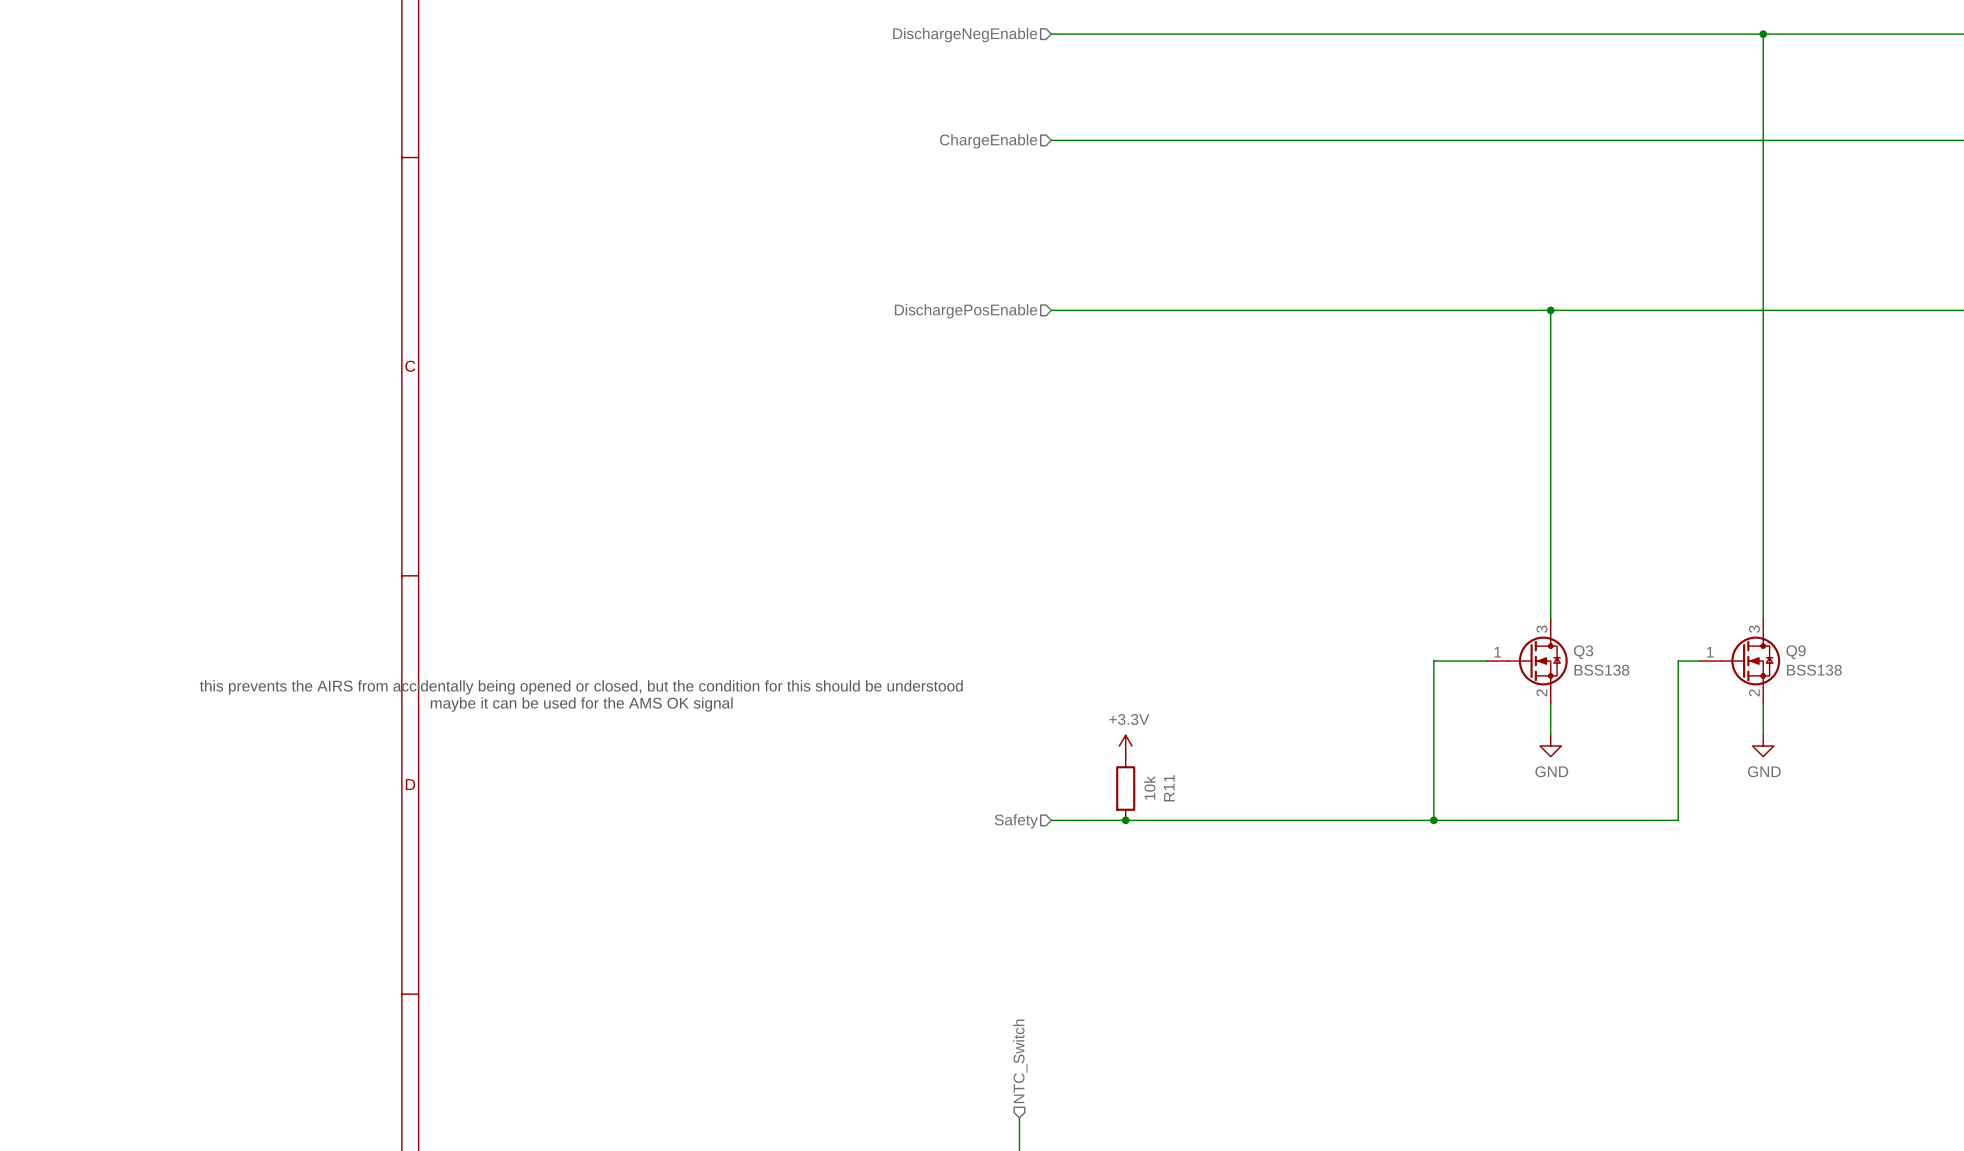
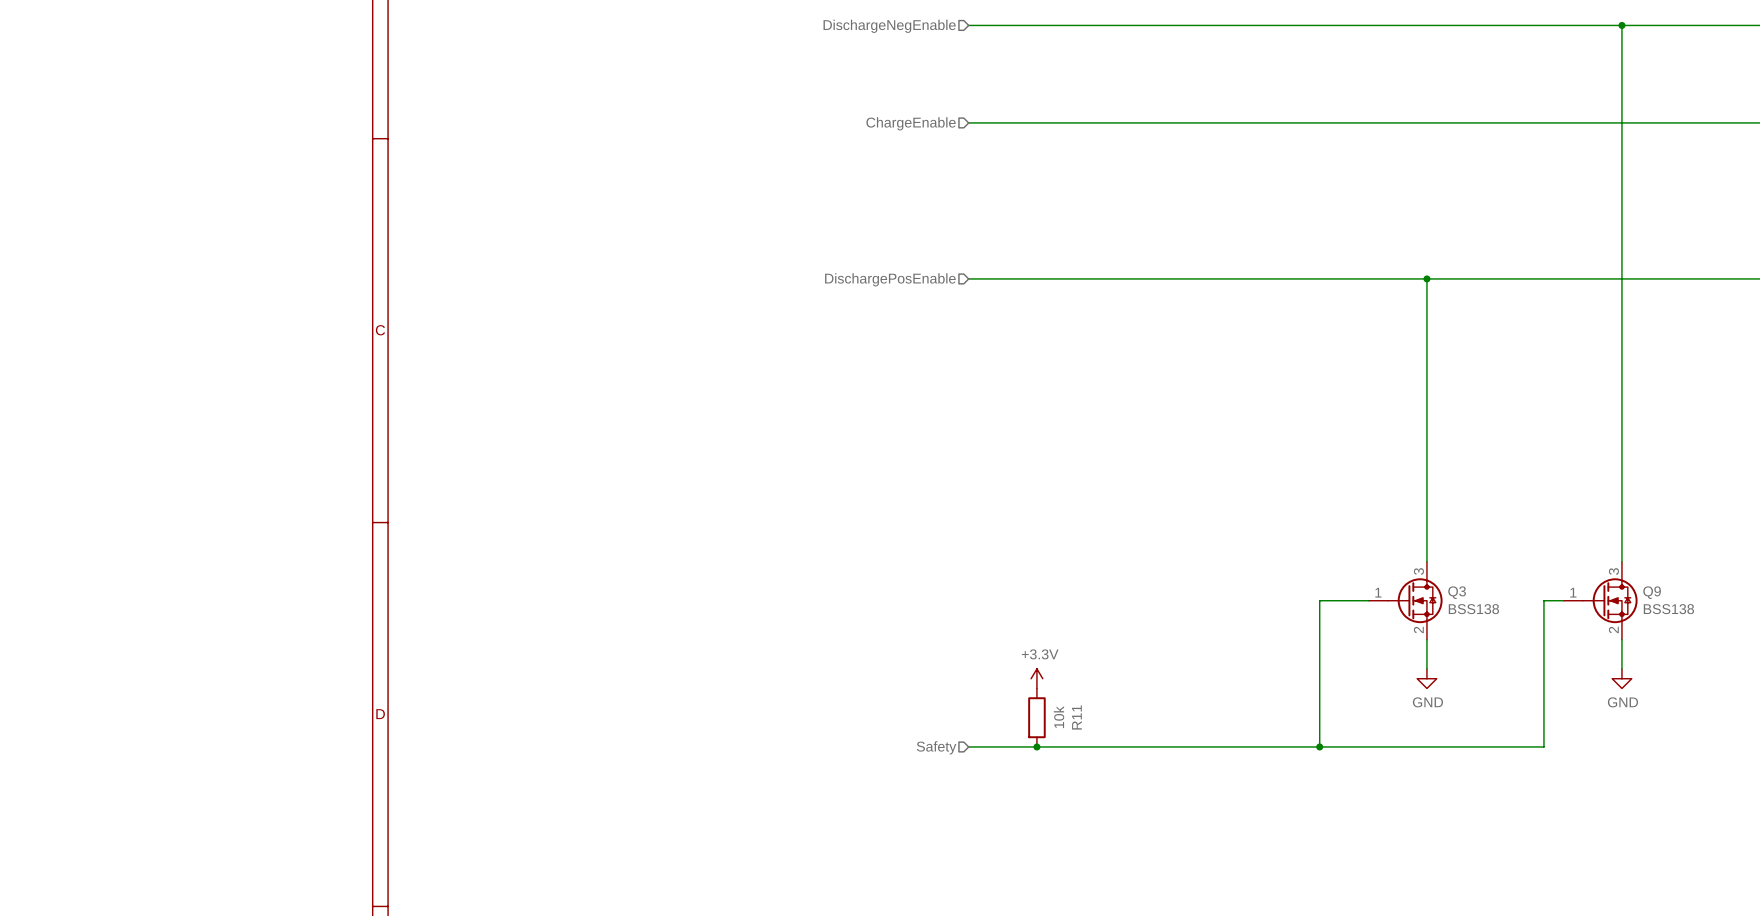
text: this prevents the AIRS from accidentally being opened or closed, but the condition for this should be understood (581, 687) -> none
text: maybe it can be used for the AMS OK signal (581, 704) -> none

